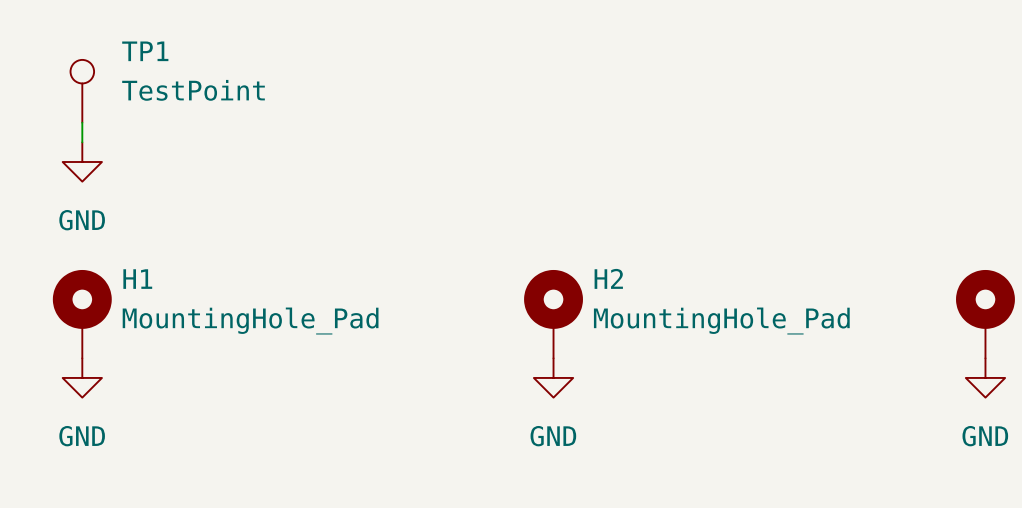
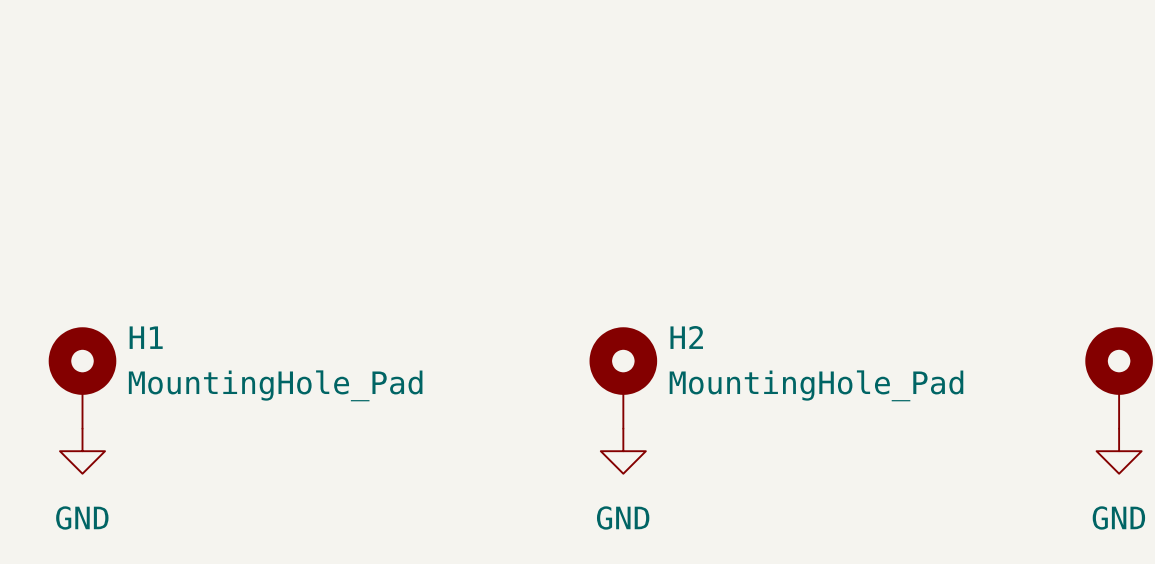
TP1: TestPoint (82, 91) -> none
wire: (82, 122) (82, 142) -> none
power symbol: GND (82, 161) -> none

